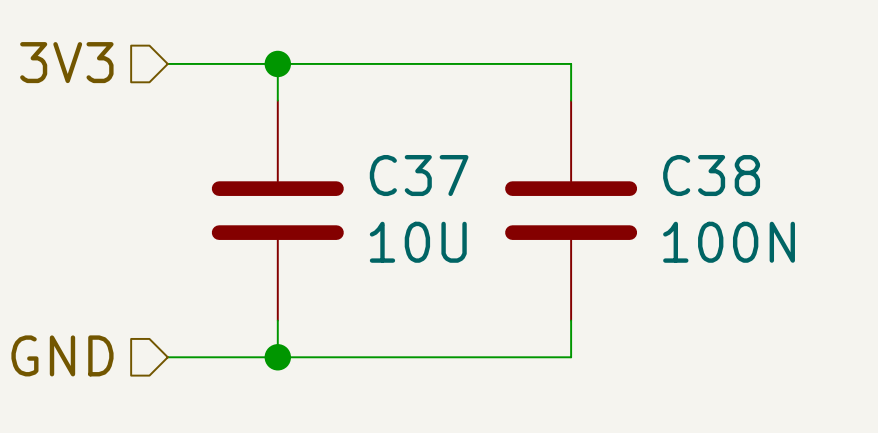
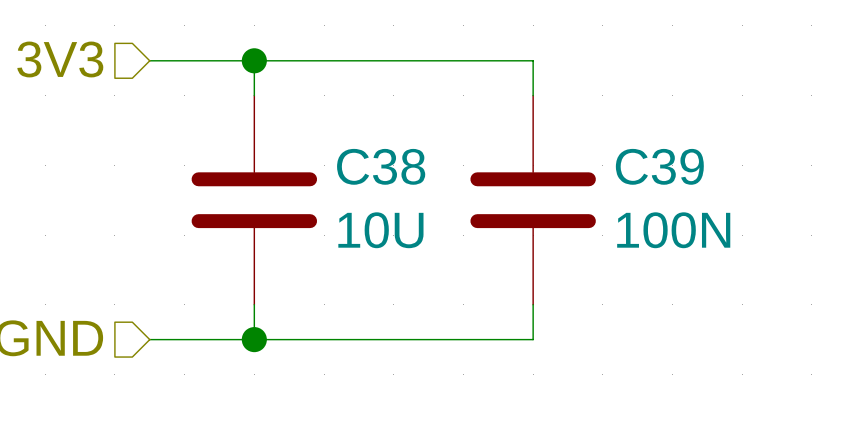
C37 name: C37 (419, 175) -> C38 (381, 166)
C38 name: C38 (711, 175) -> C39 (659, 166)

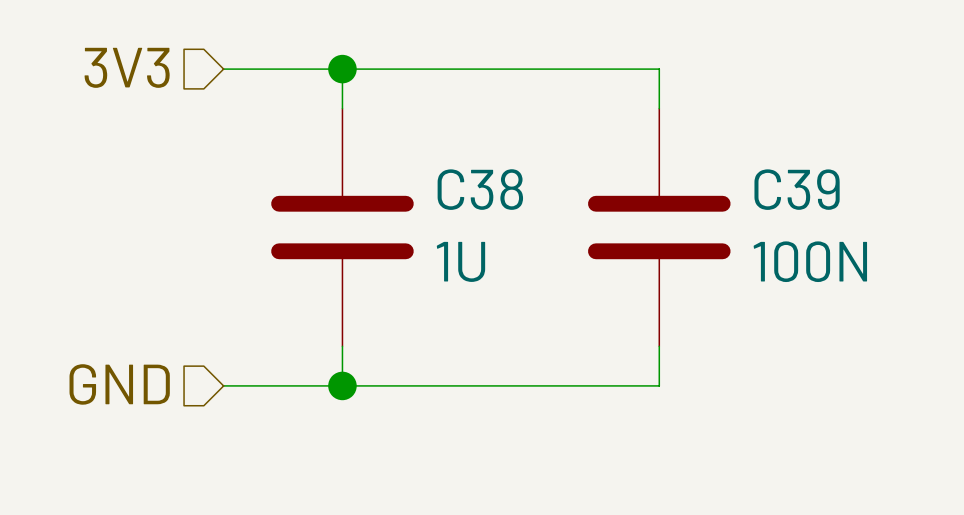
C38 value: 10U (380, 230) -> 1U (460, 261)

